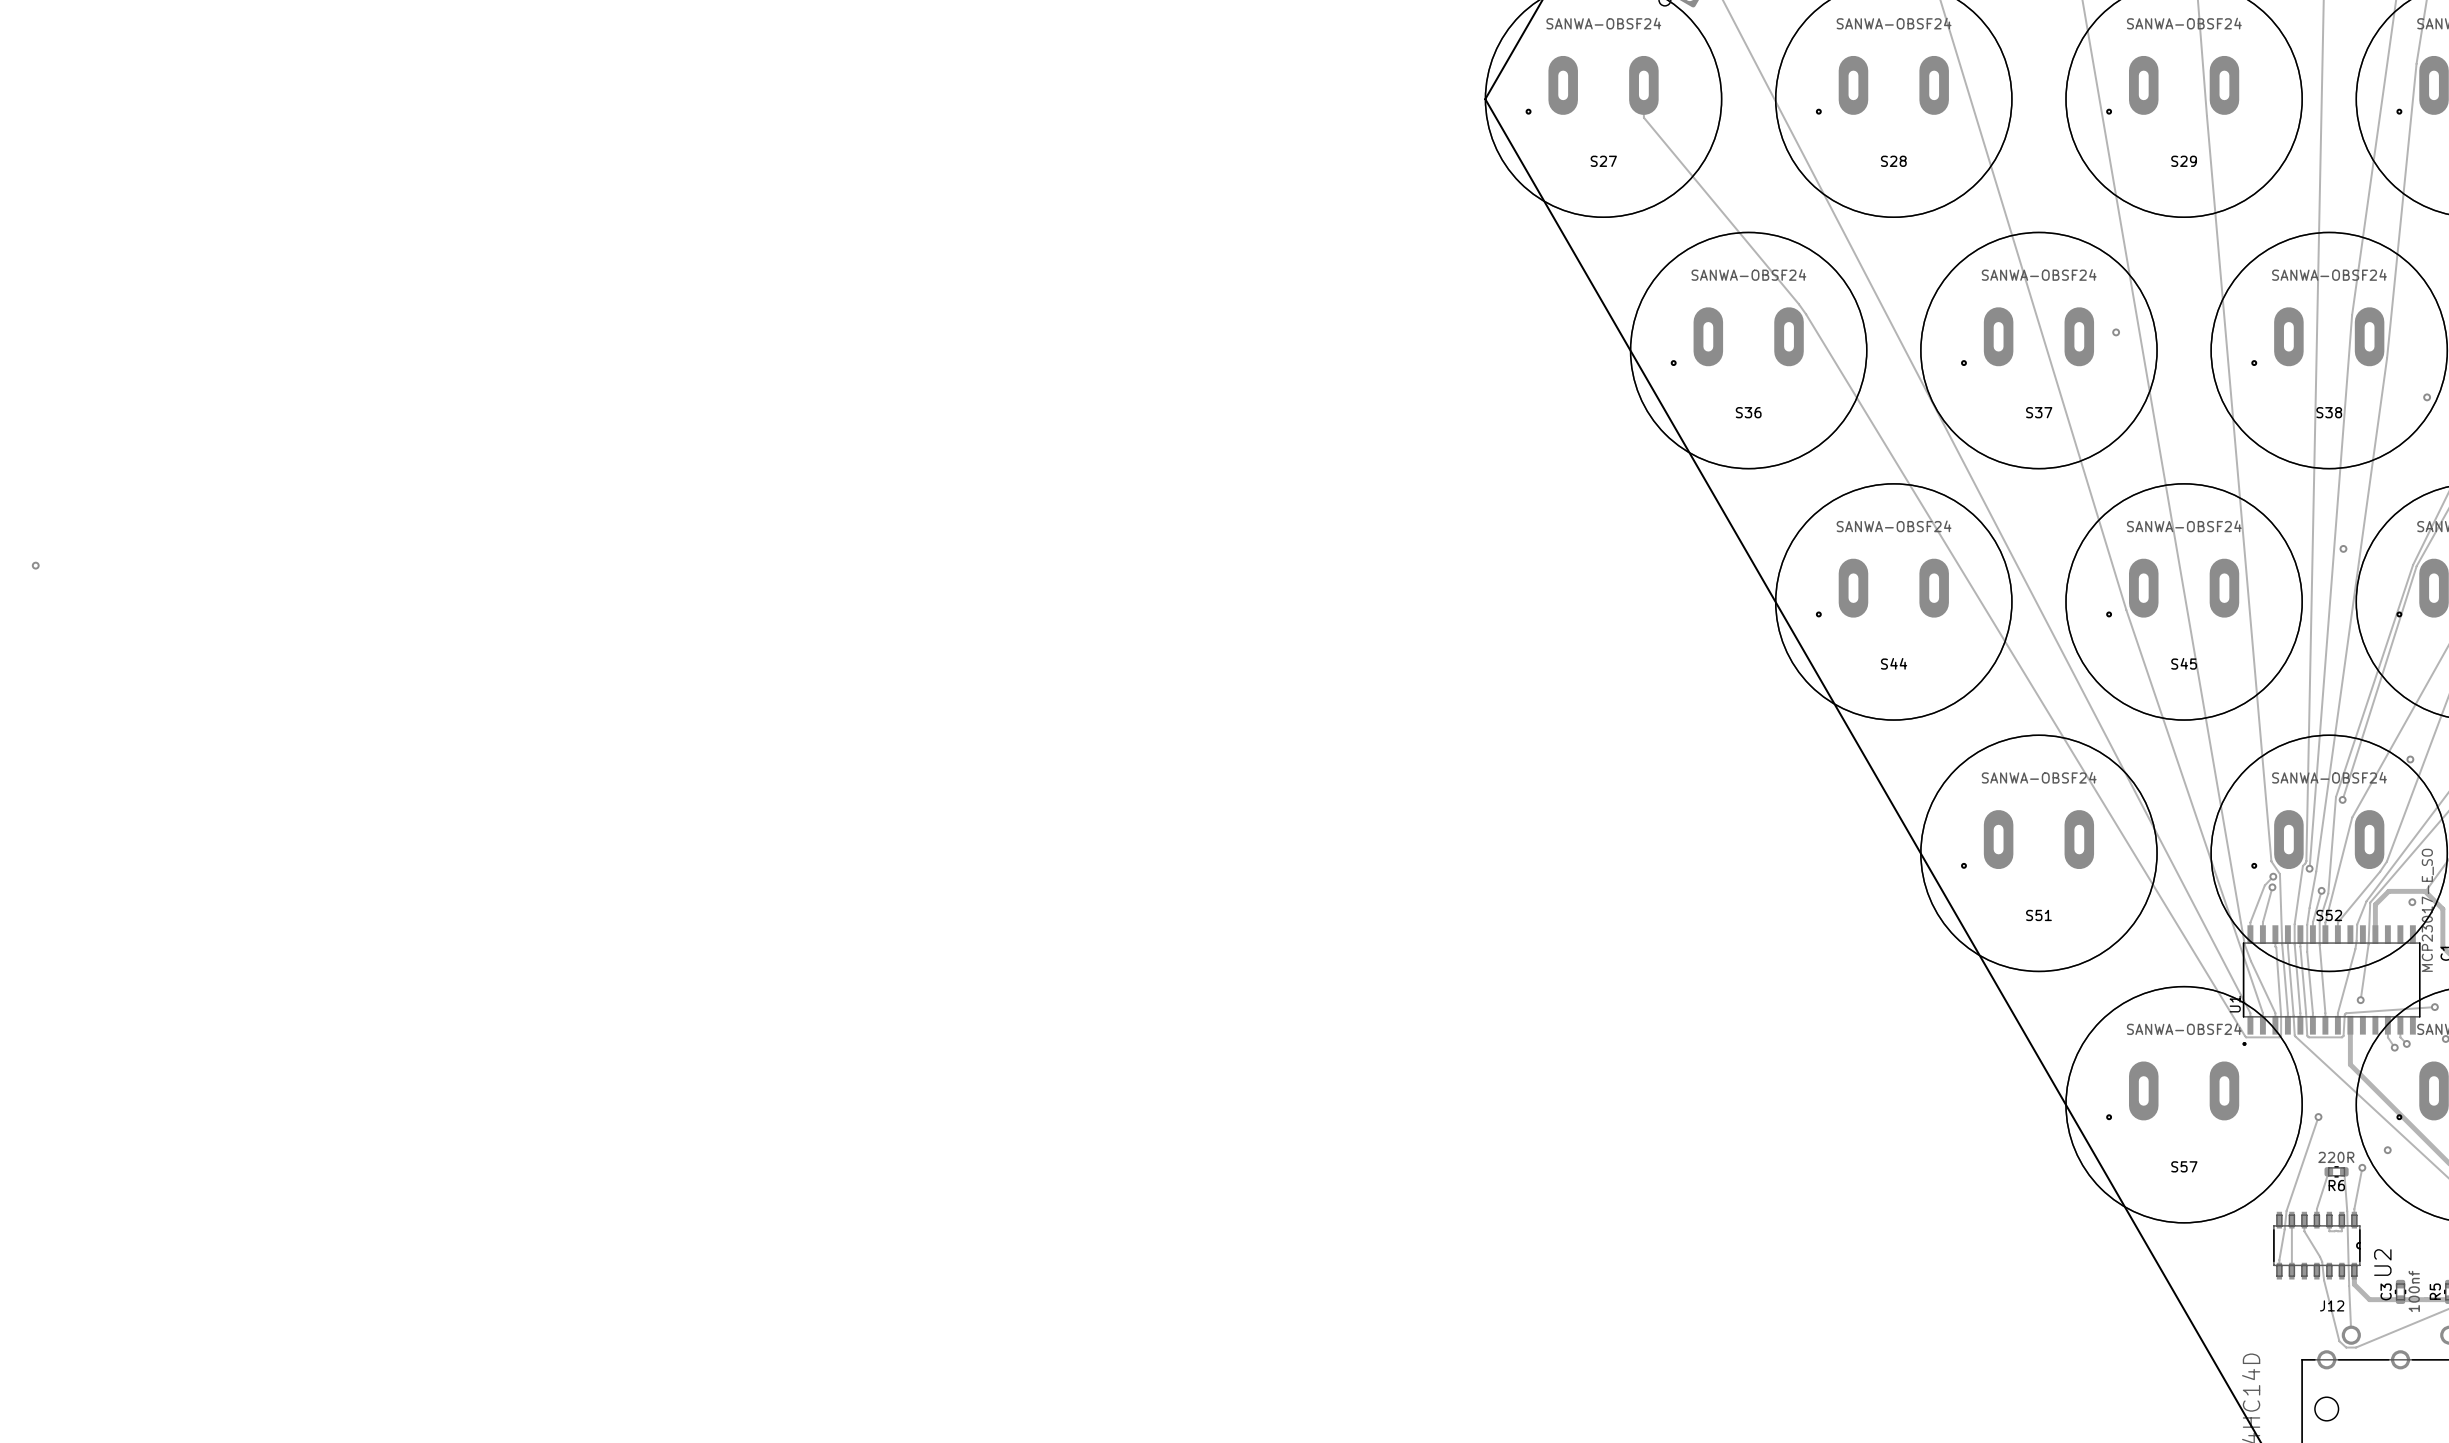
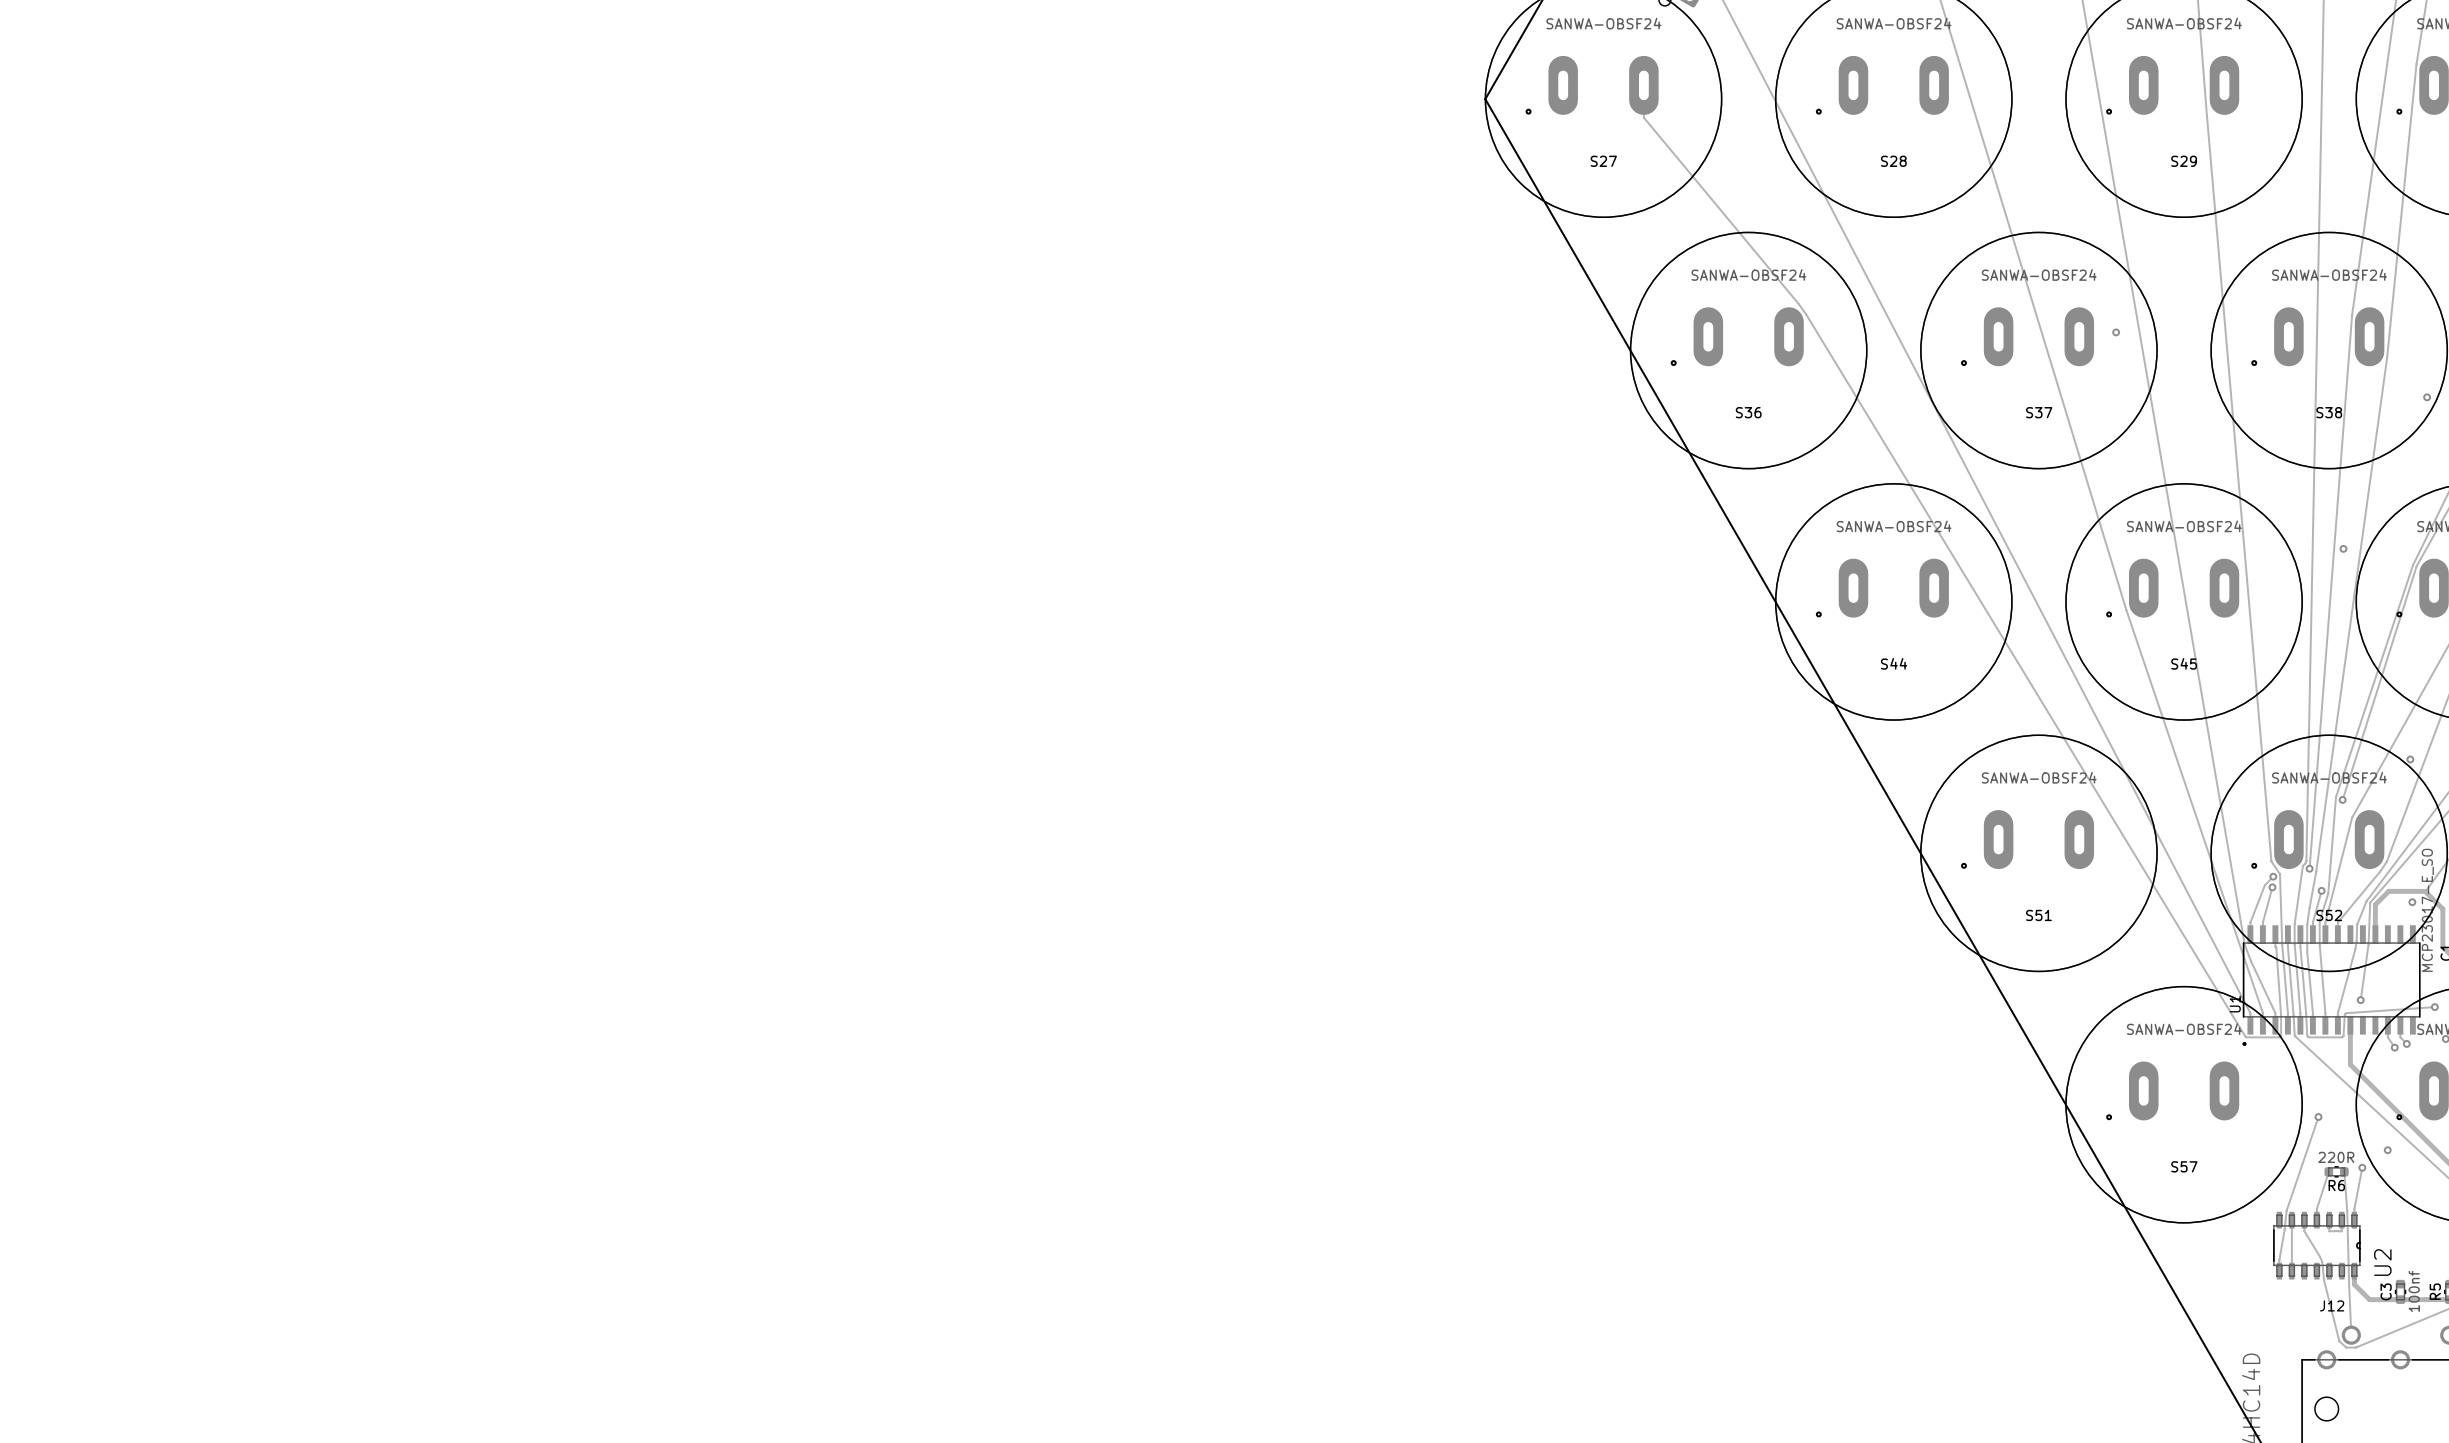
via: (35, 565) -> none

